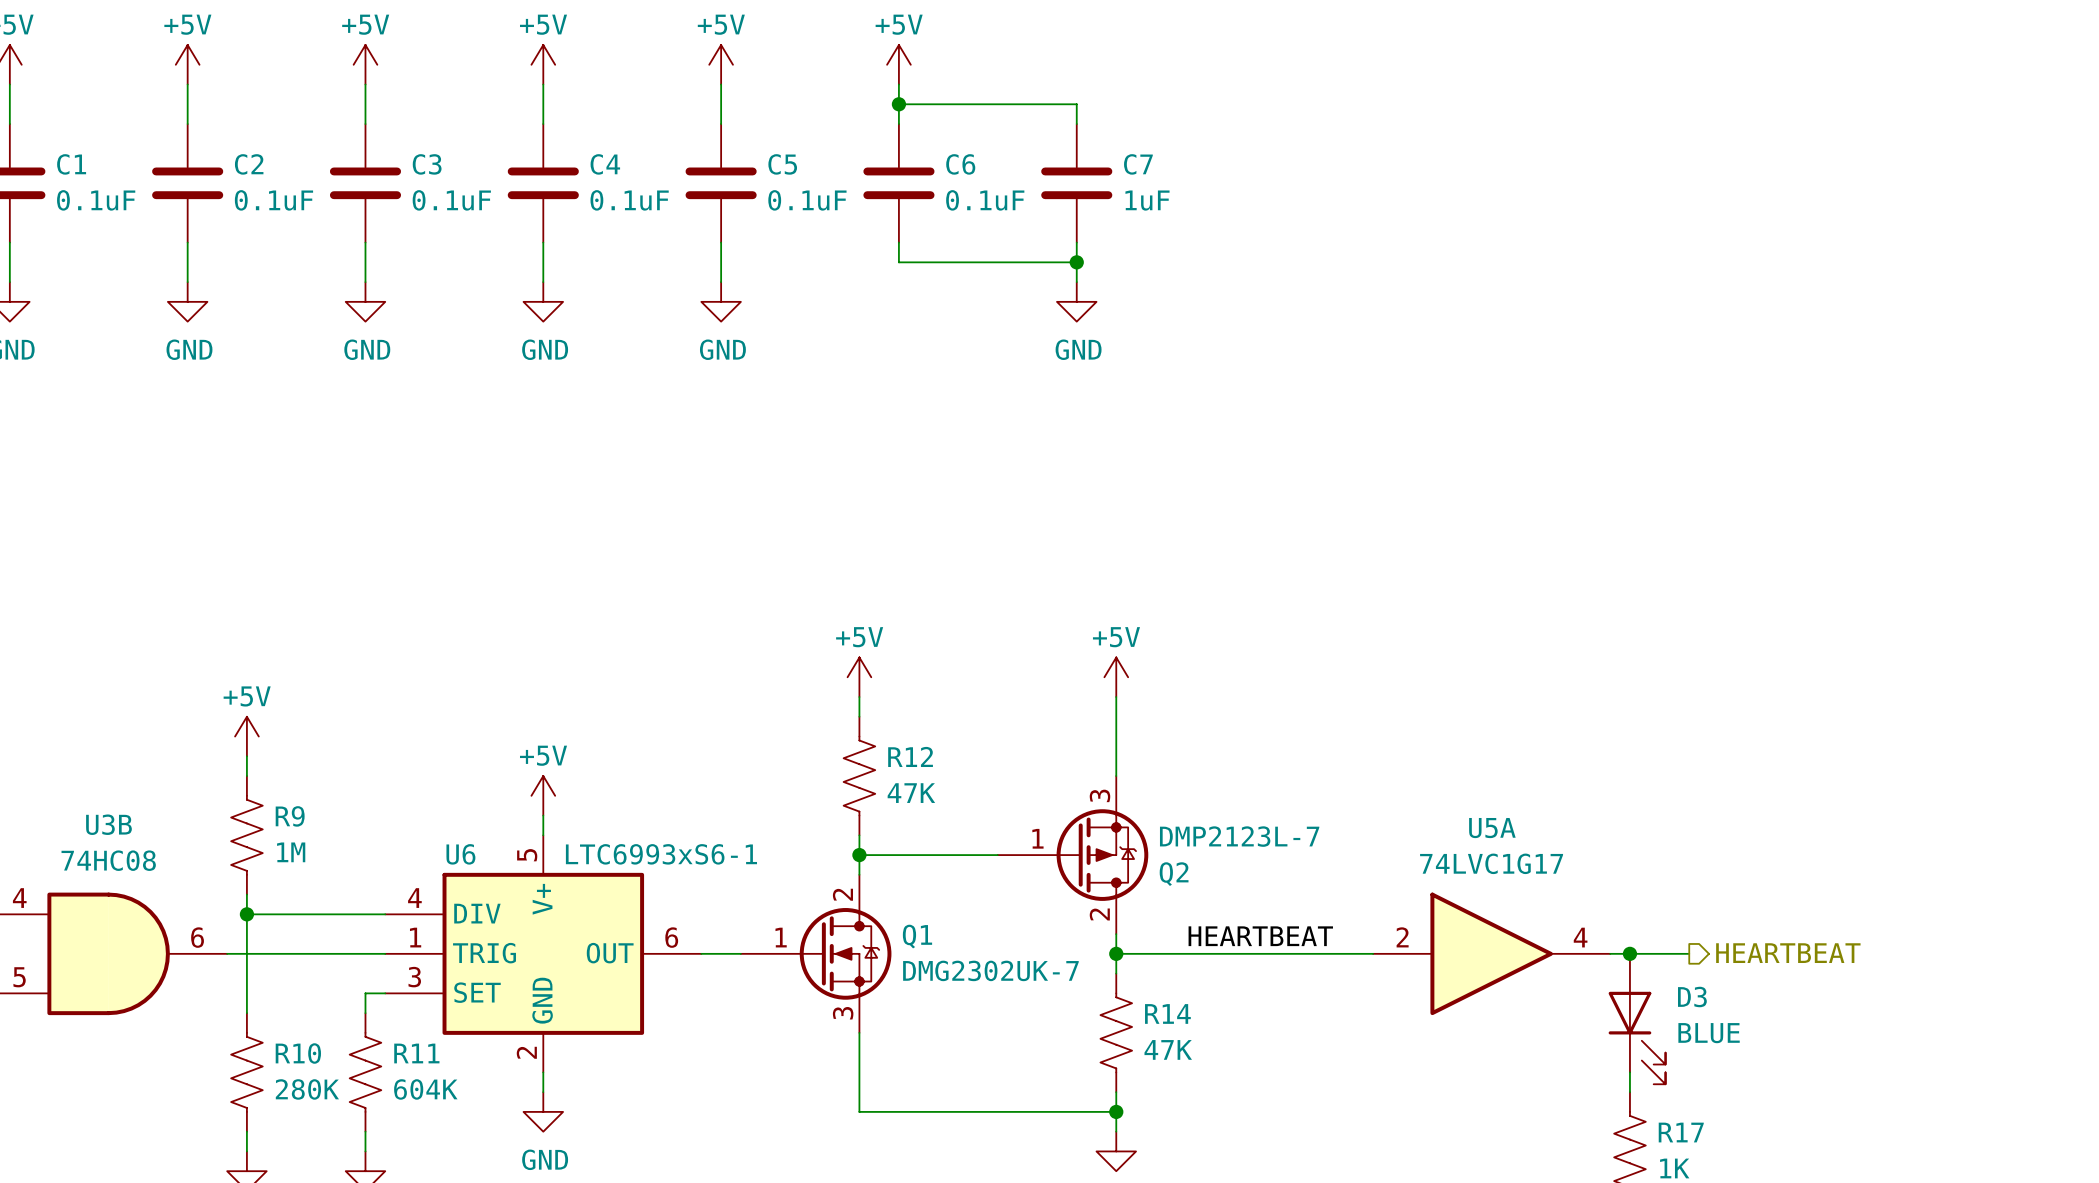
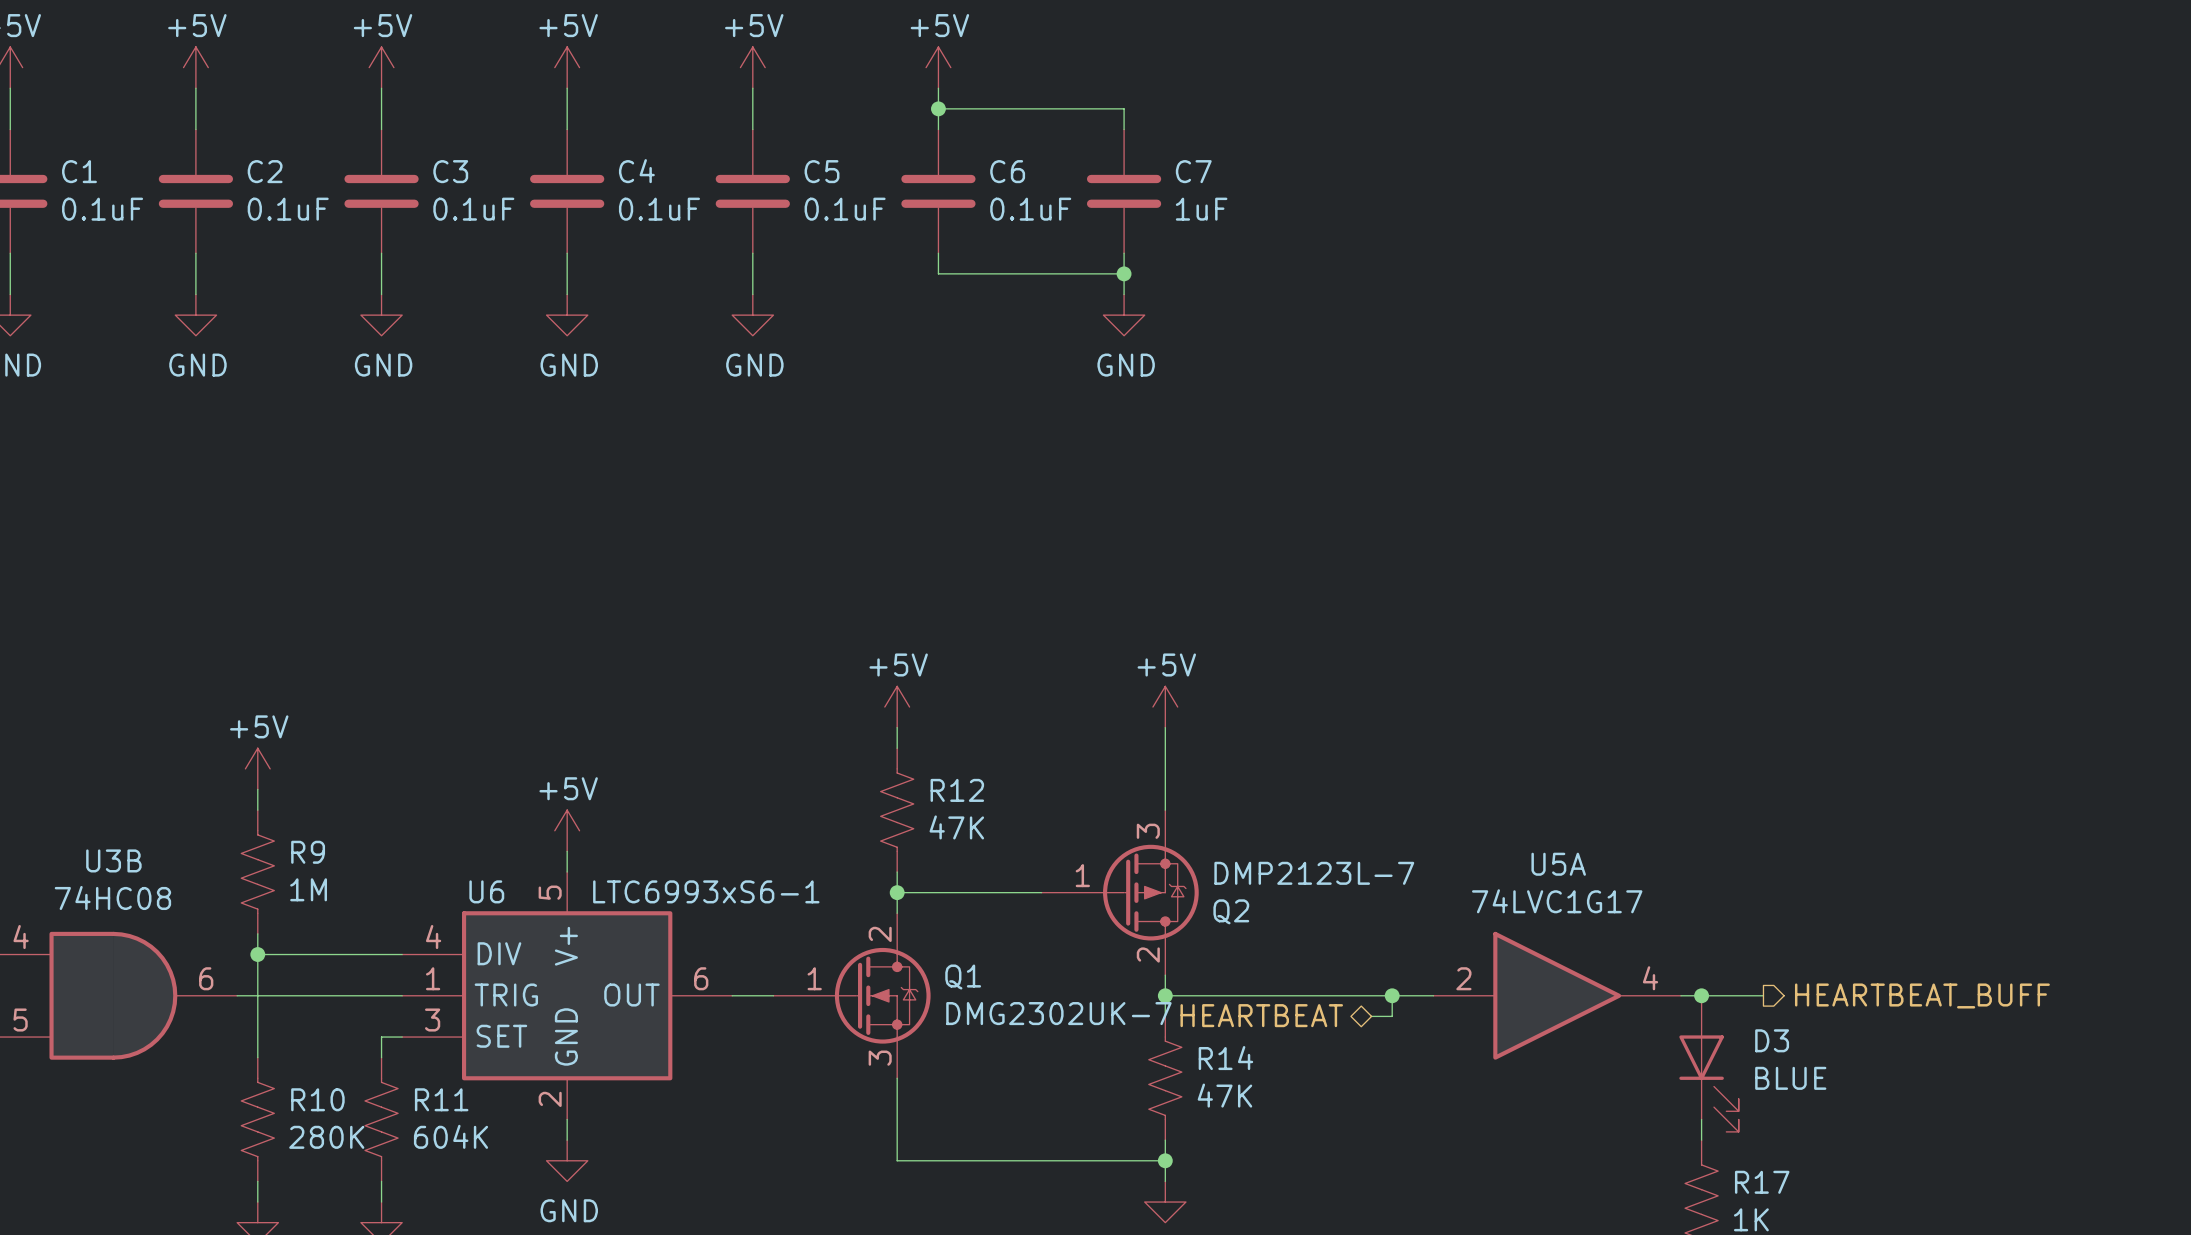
label: HEARTBEAT (1260, 936) -> none
wire: none -> (1392, 995) (1392, 1016) (1371, 1016)
junction: none -> (1392, 995)
hierarchical label: HEARTBEAT (1788, 953) -> HEARTBEAT_BUFF (1922, 995)
hierarchical label: none -> HEARTBEAT (1261, 1015)

